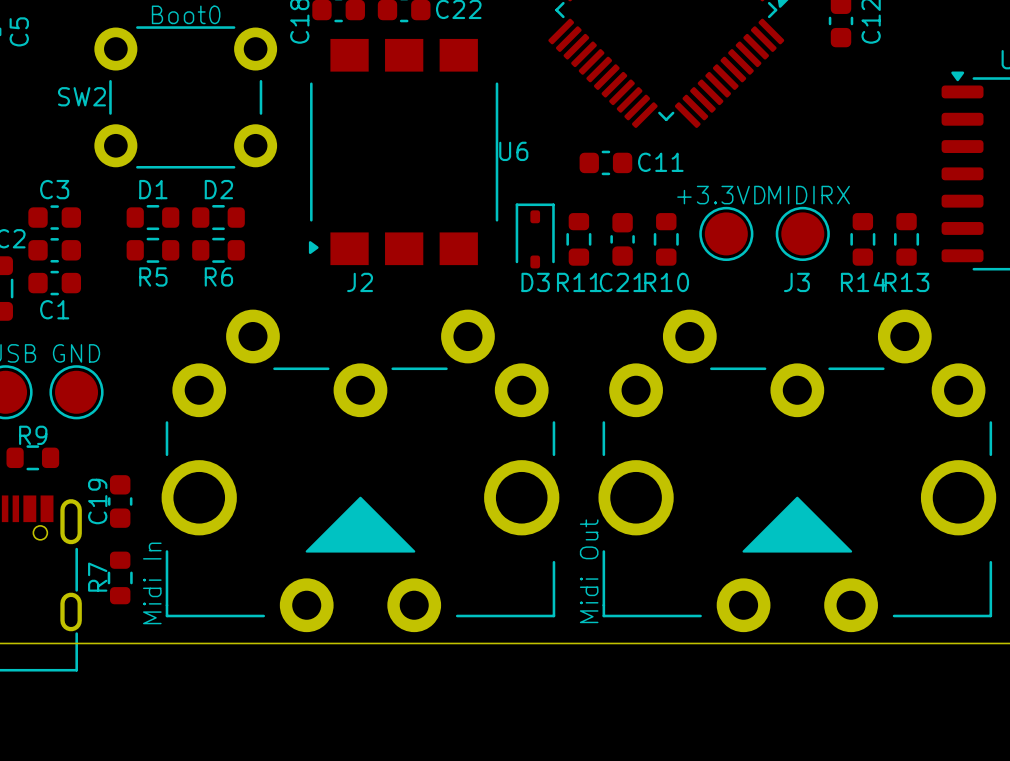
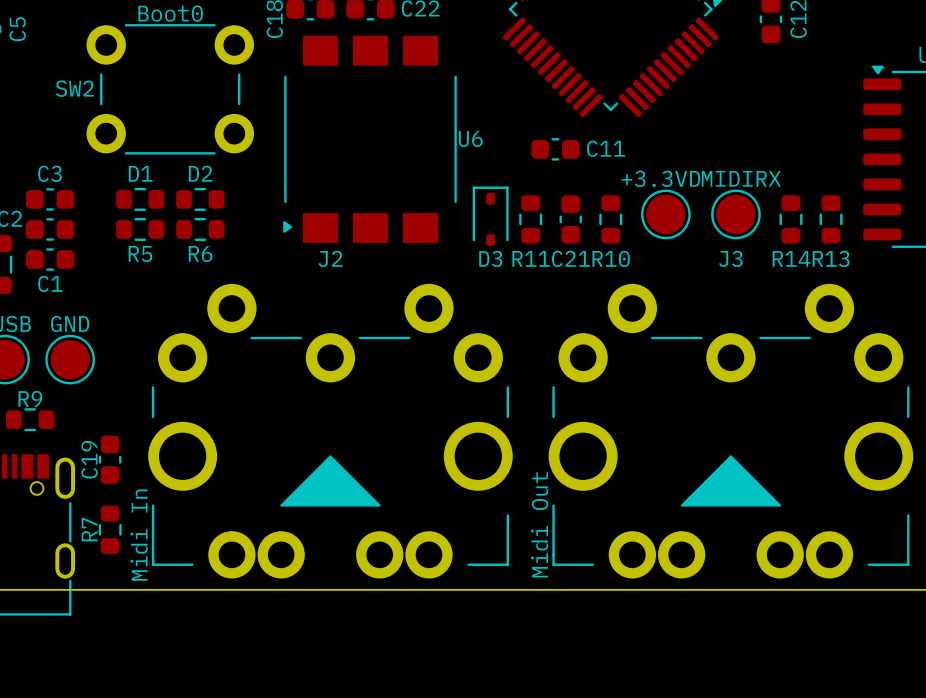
J2 footprint: [161, 309, 560, 633] -> [148, 283, 513, 579]
J3 footprint: [598, 309, 997, 633] -> [548, 283, 914, 579]

